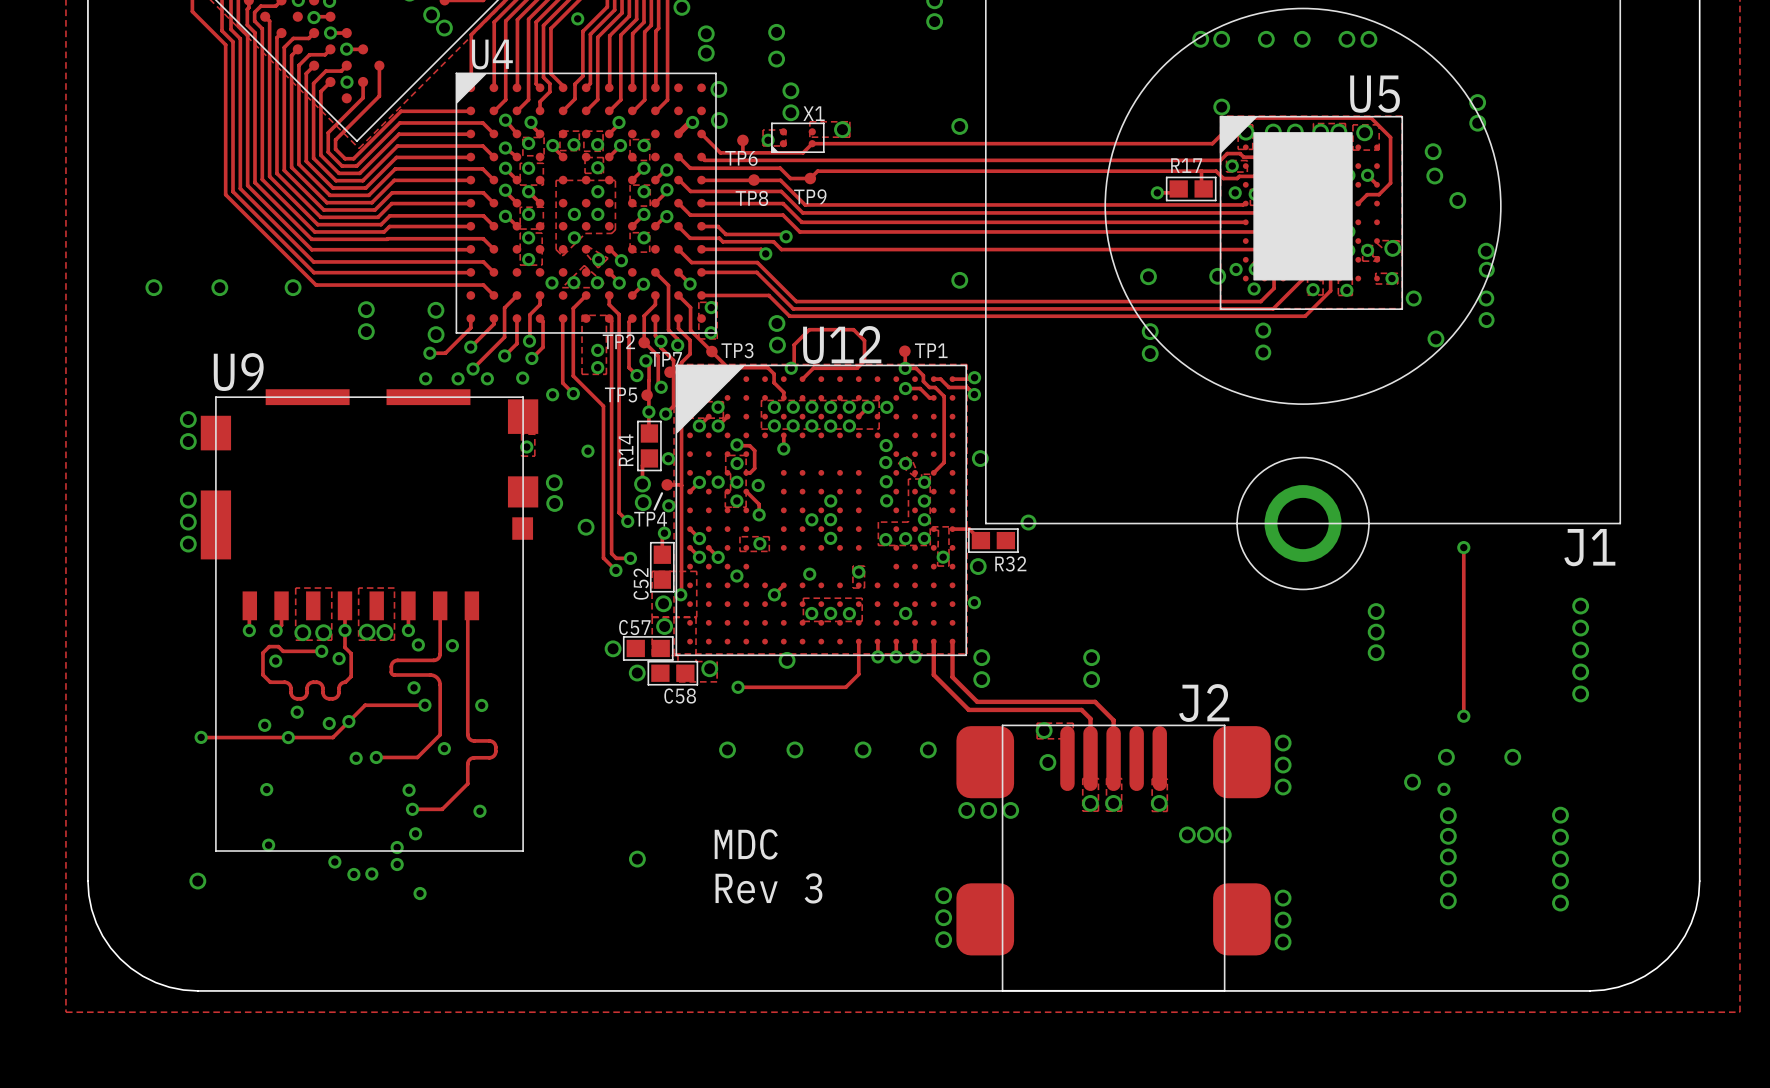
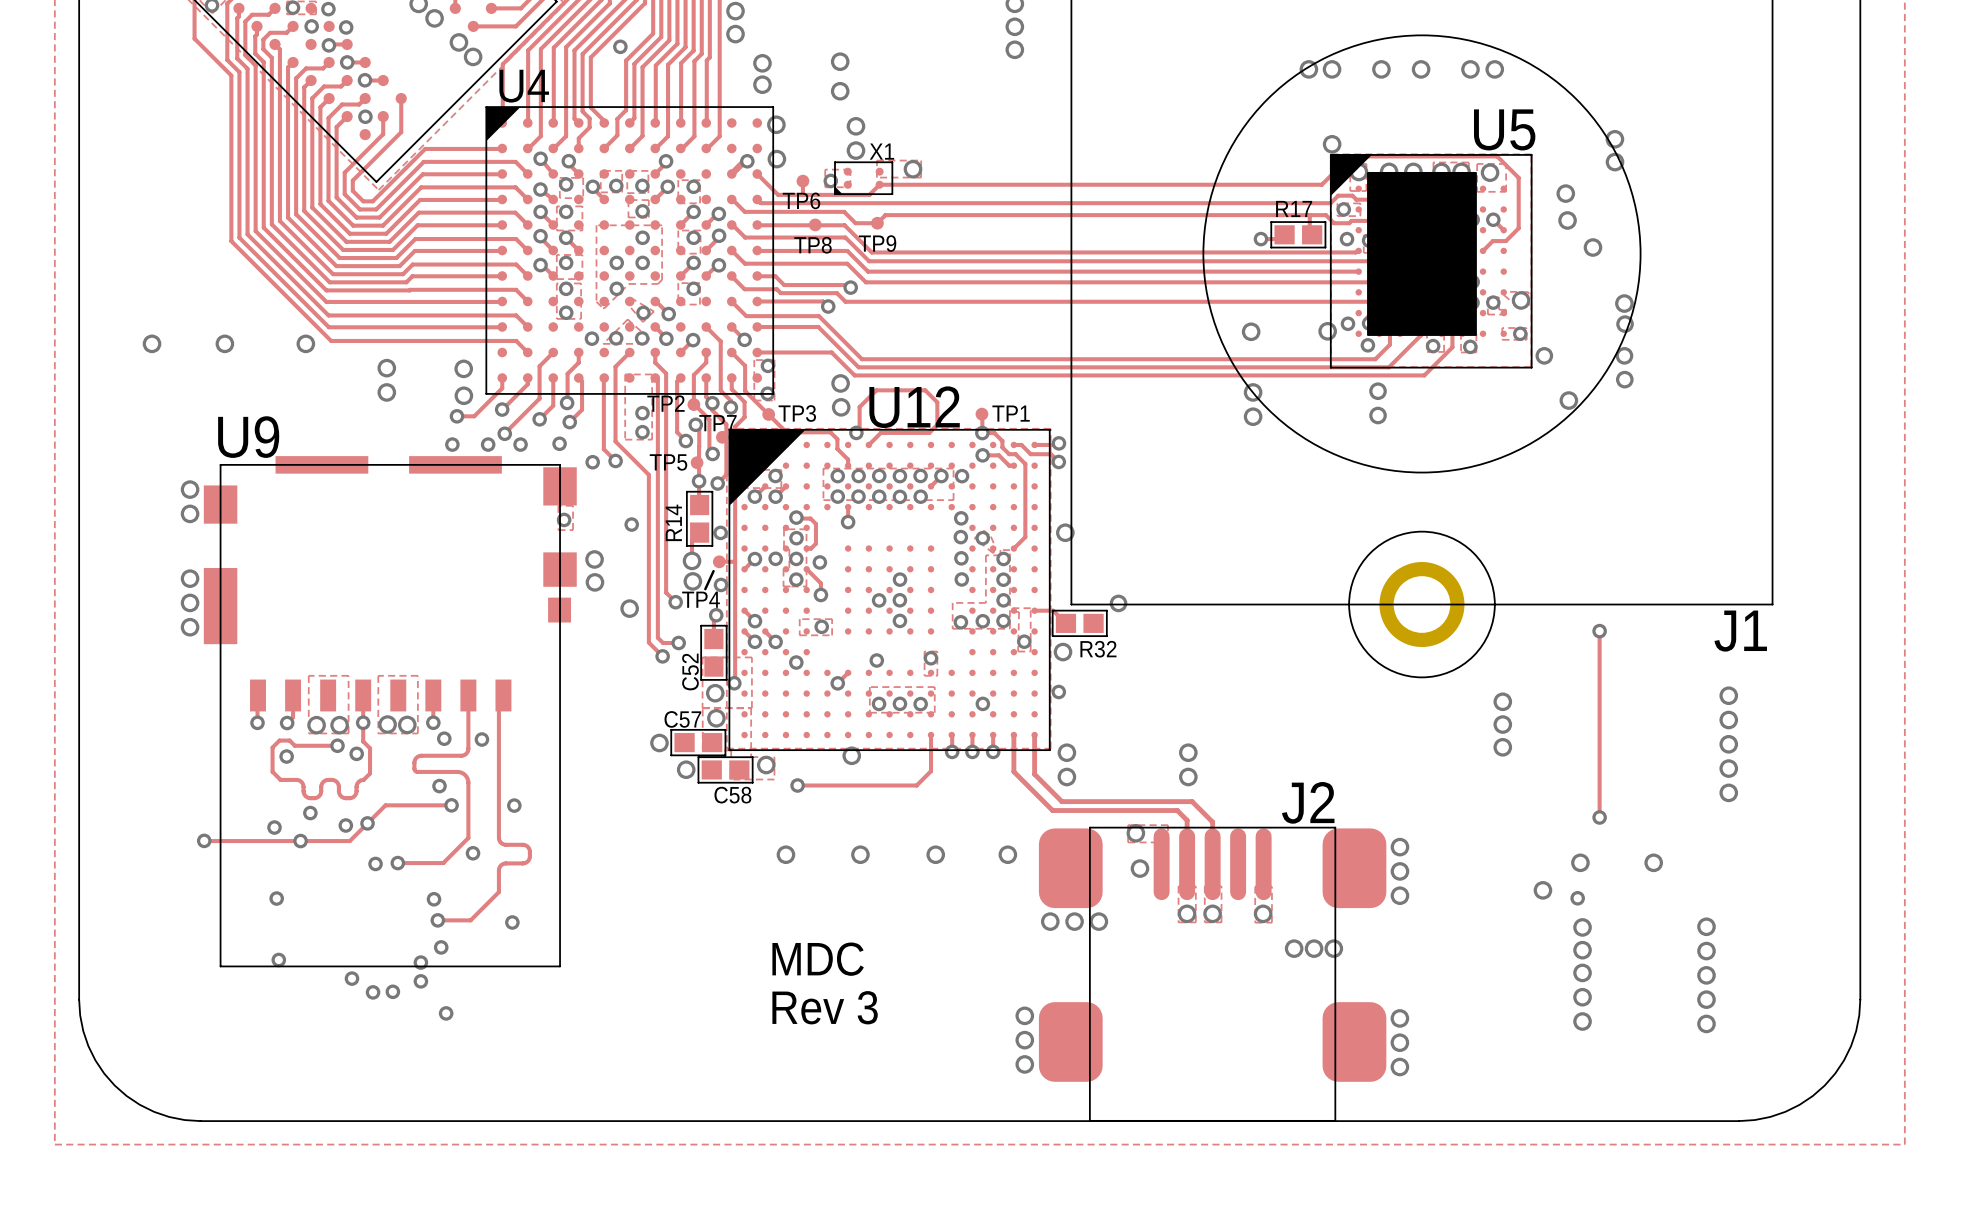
via: (959, 126) -> none
via: (959, 280) -> none
via: (637, 859) -> none
via: (197, 881) -> none

